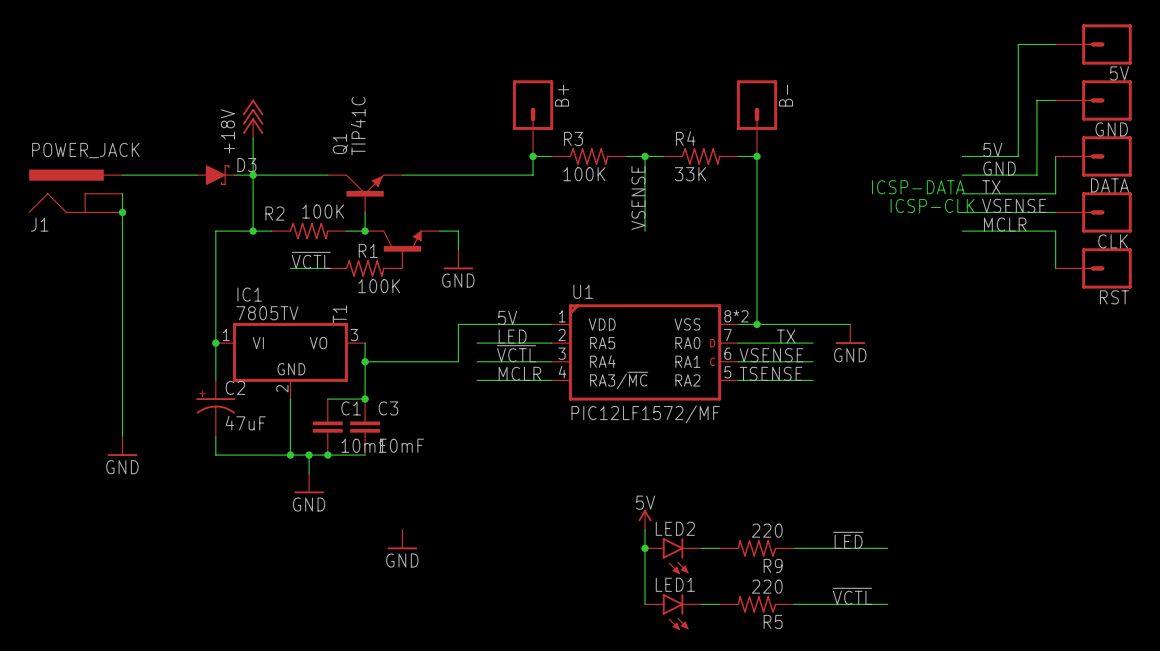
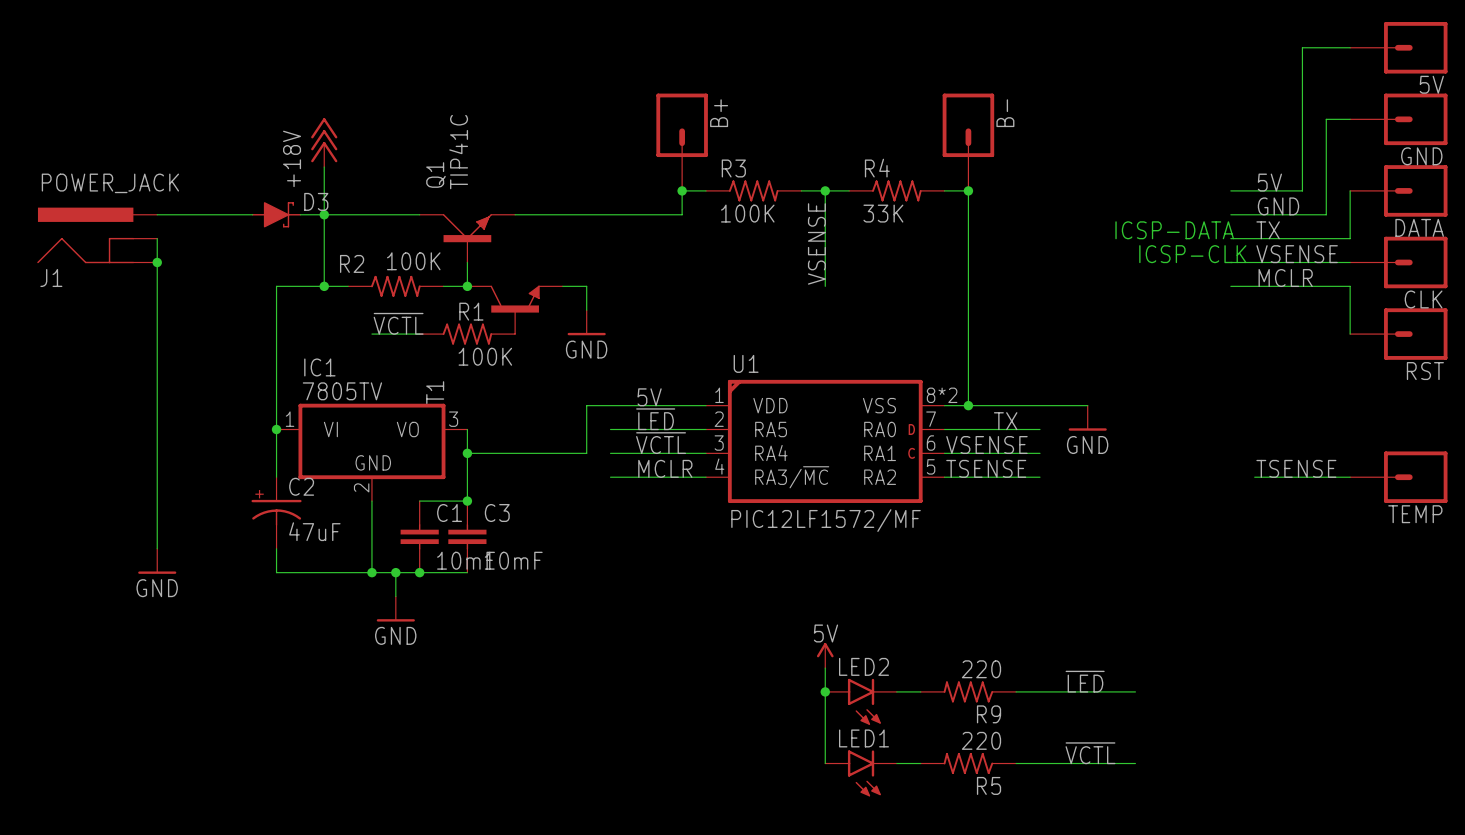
label: LED (512, 336) -> ~{LED} (655, 419)
label: none -> TSENSE (1296, 468)
wire: none -> (1254, 477) (1350, 477)
TEMP: none -> (1398, 477)
power symbol: GND (402, 539) -> none

